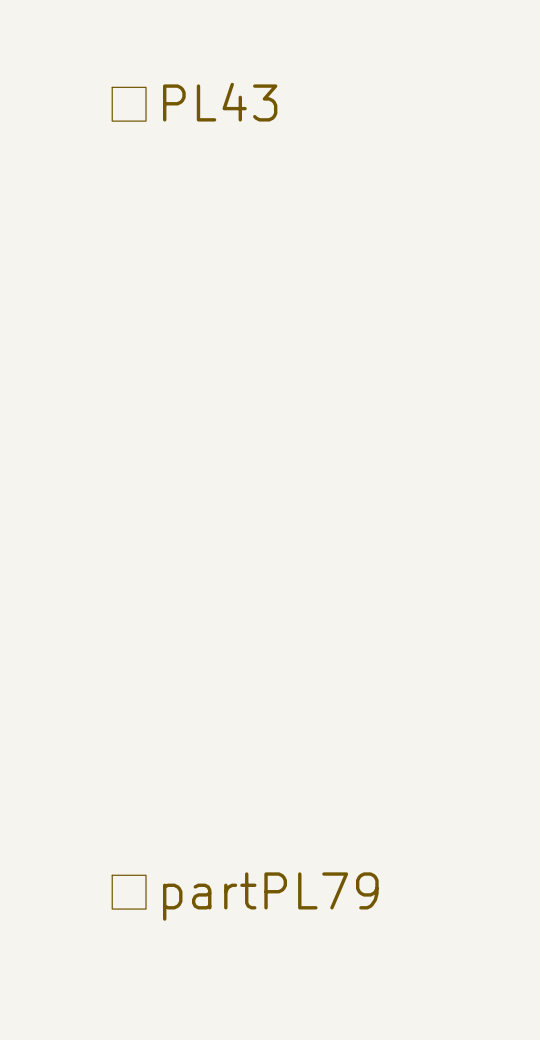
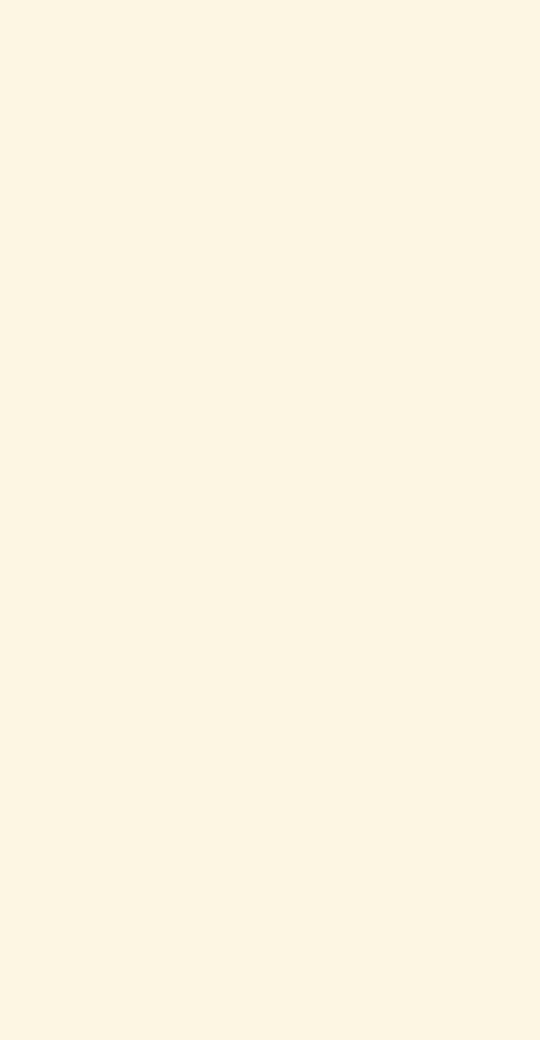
hierarchical label: PL43 (220, 102) -> none
hierarchical label: partPL79 (270, 896) -> none

